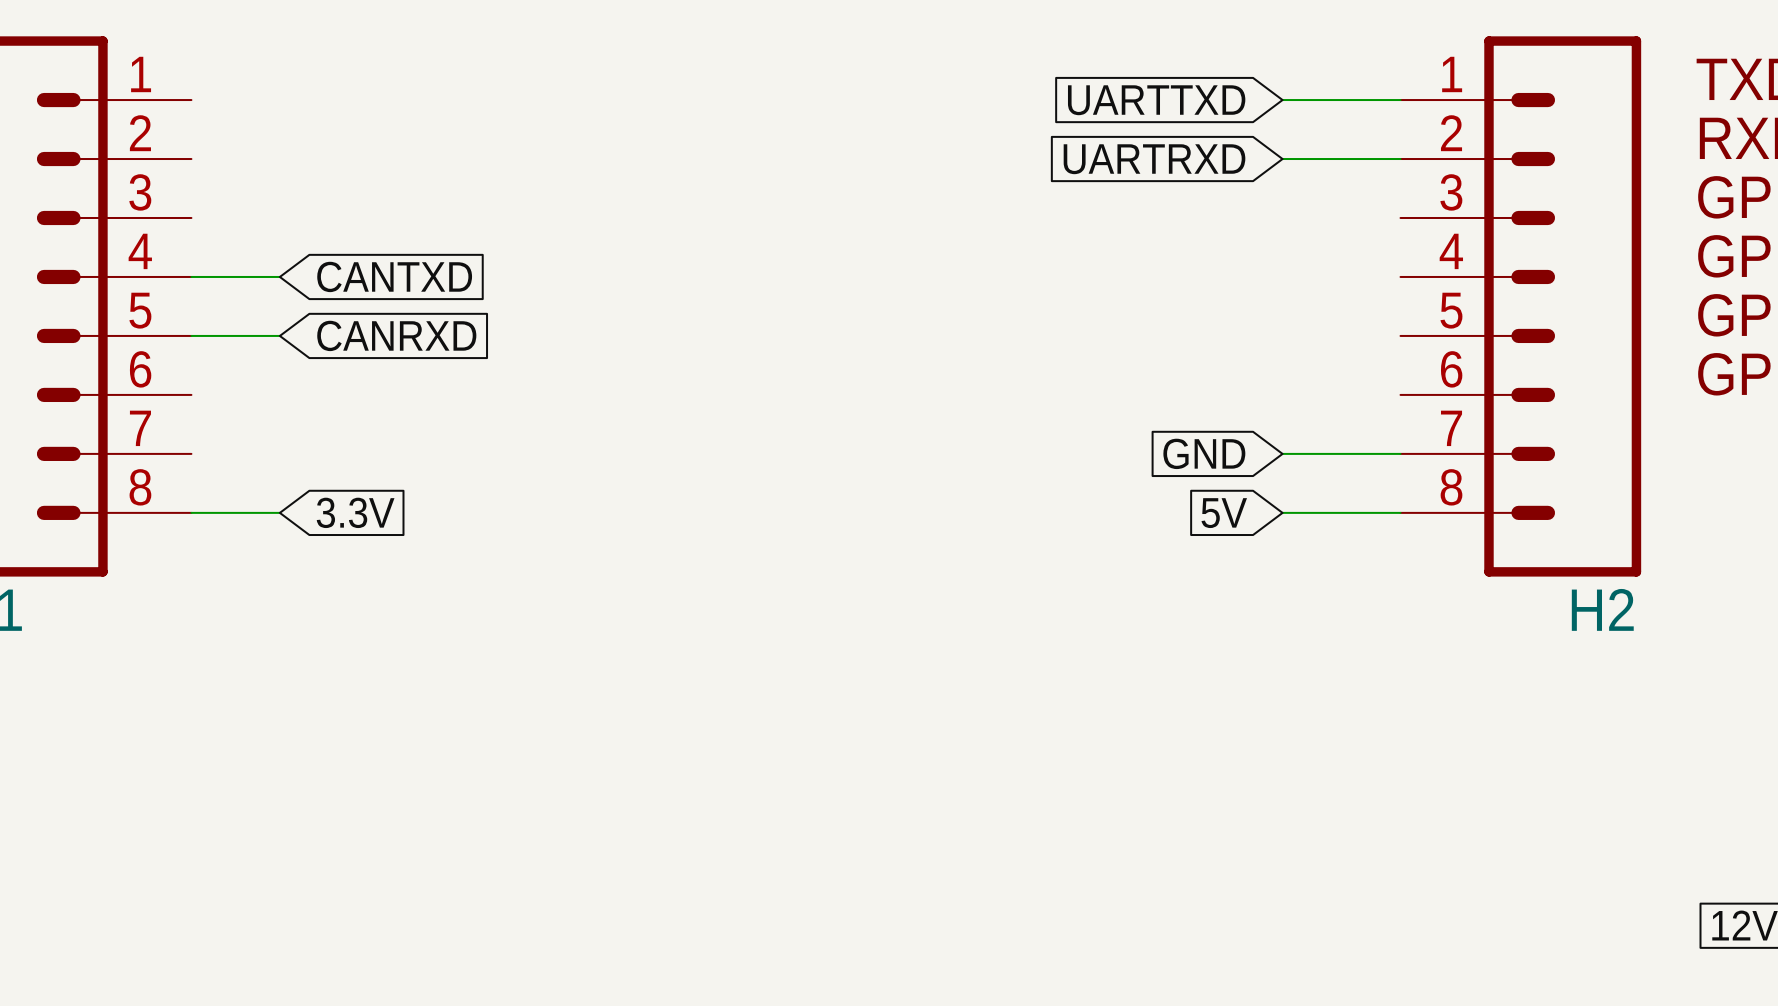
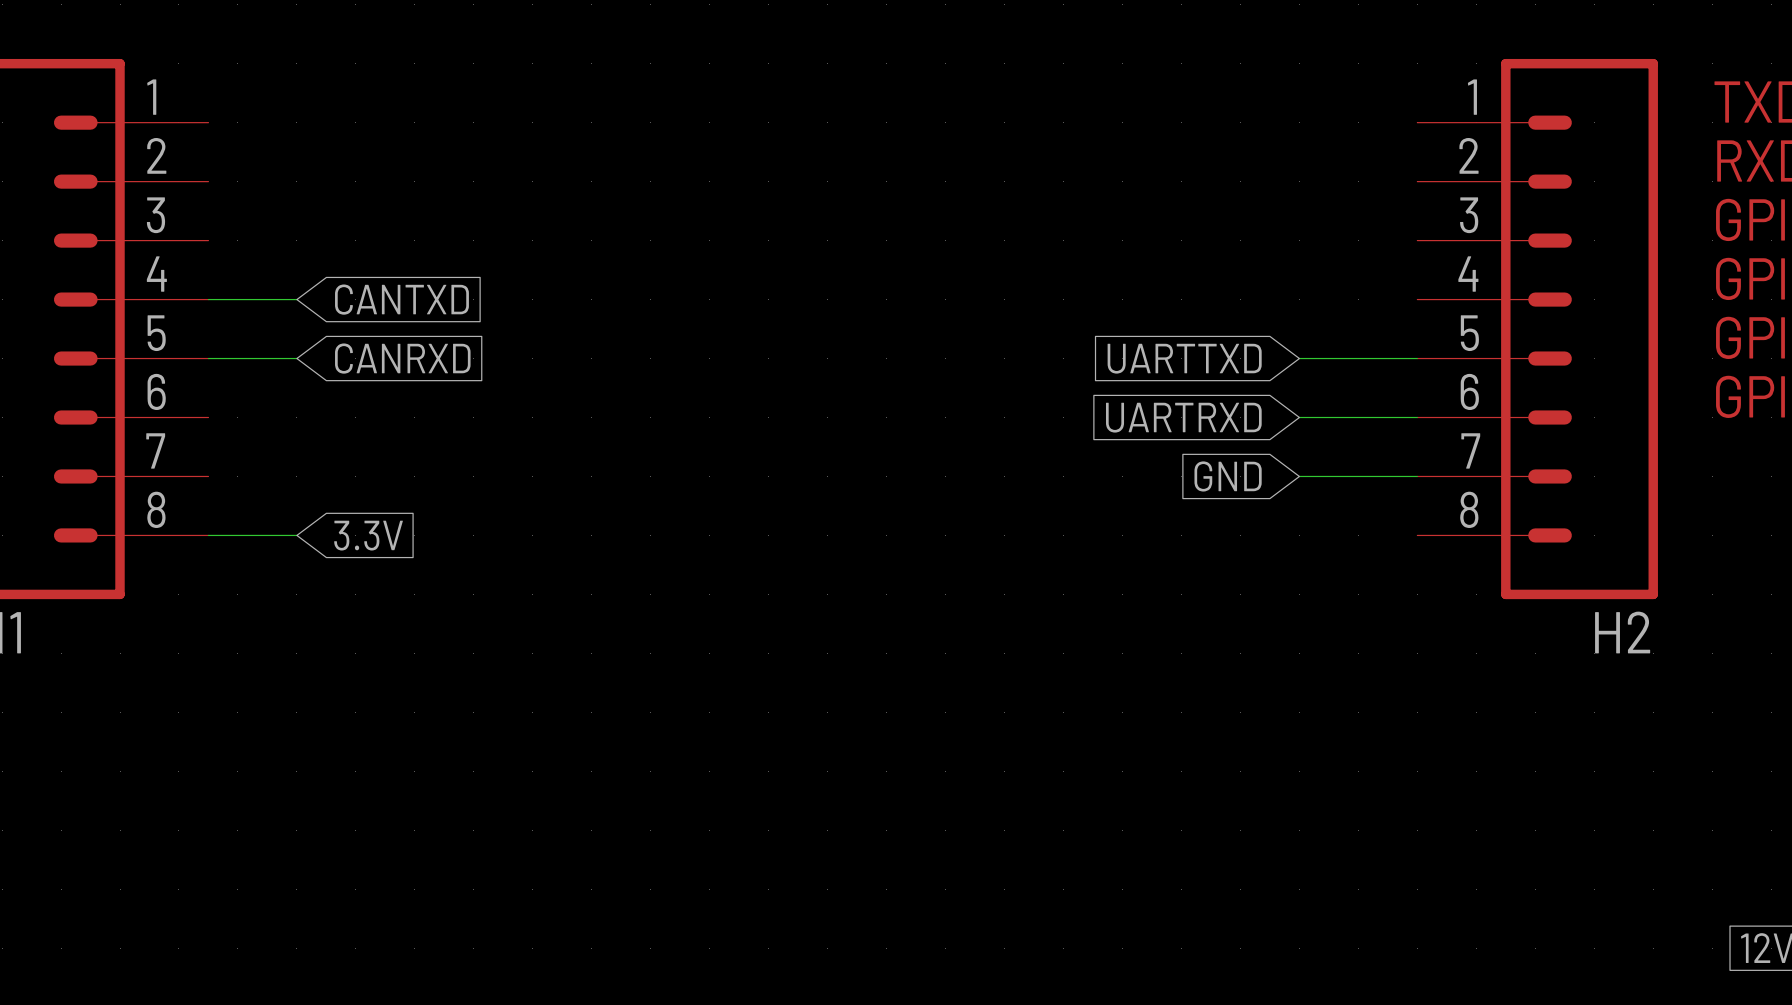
global label position: UARTTXD (1156, 100) -> UARTTXD (1184, 358)
wire: (1282, 100) (1400, 100) -> none
global label position: UARTRXD (1154, 159) -> UARTRXD (1183, 417)
wire: (1282, 159) (1400, 159) -> (1299, 358) (1417, 358)
wire: (1282, 512) (1400, 512) -> (1299, 417) (1417, 417)
global label: 5V (1224, 513) -> none

